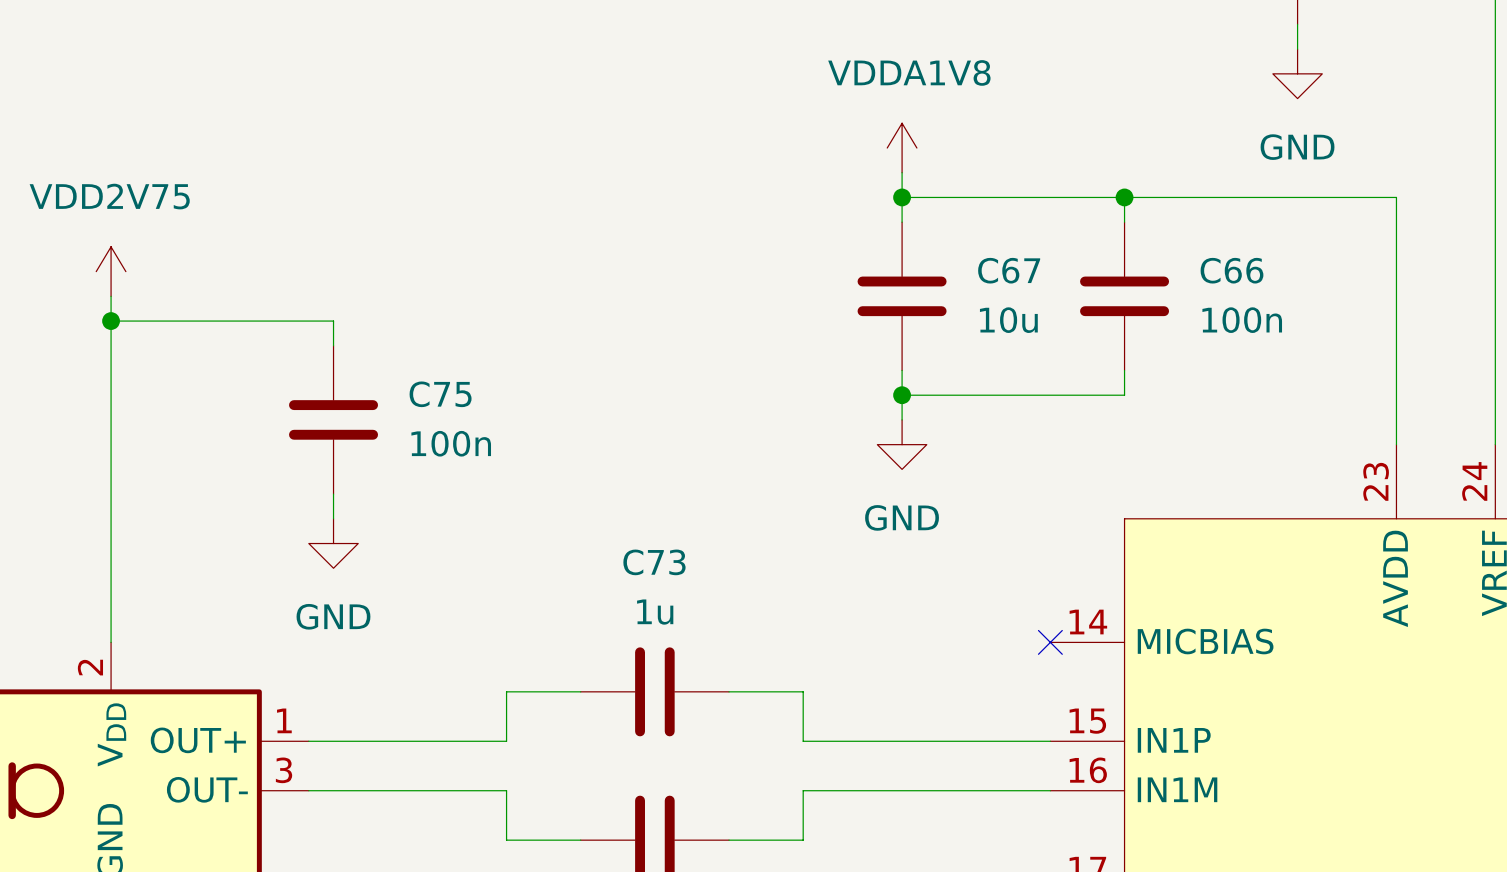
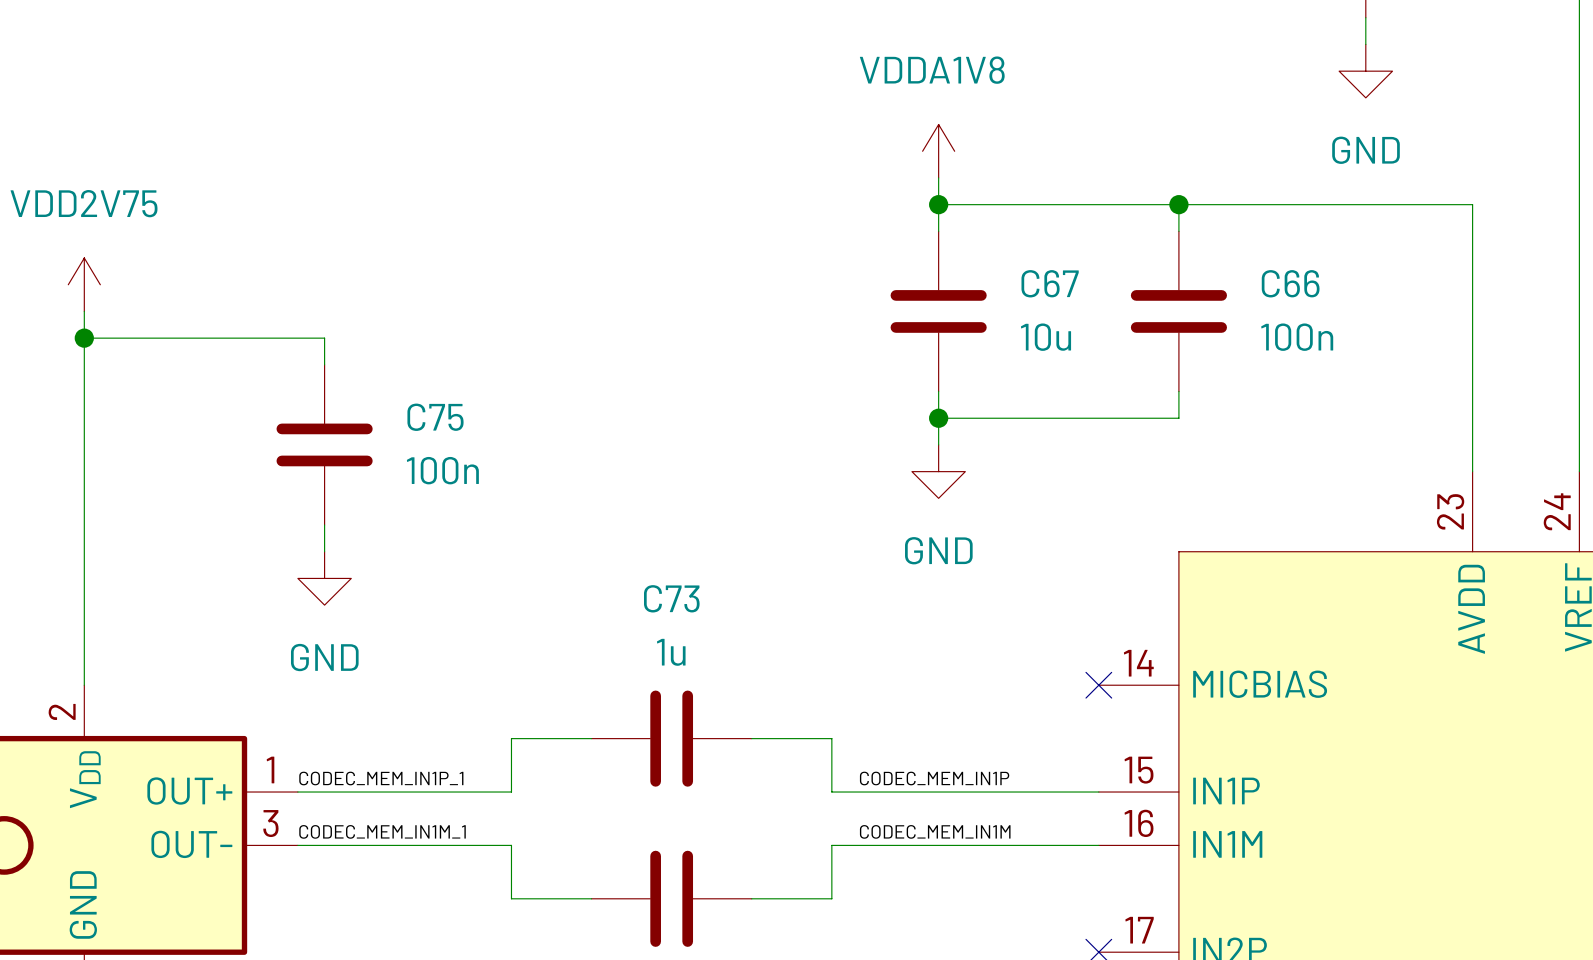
label: none -> CODEC_MEM_IN1P_1 (381, 778)
label: none -> CODEC_MEM_IN1P (934, 778)
label: none -> CODEC_MEM_IN1M_1 (382, 831)
label: none -> CODEC_MEM_IN1M (935, 831)

